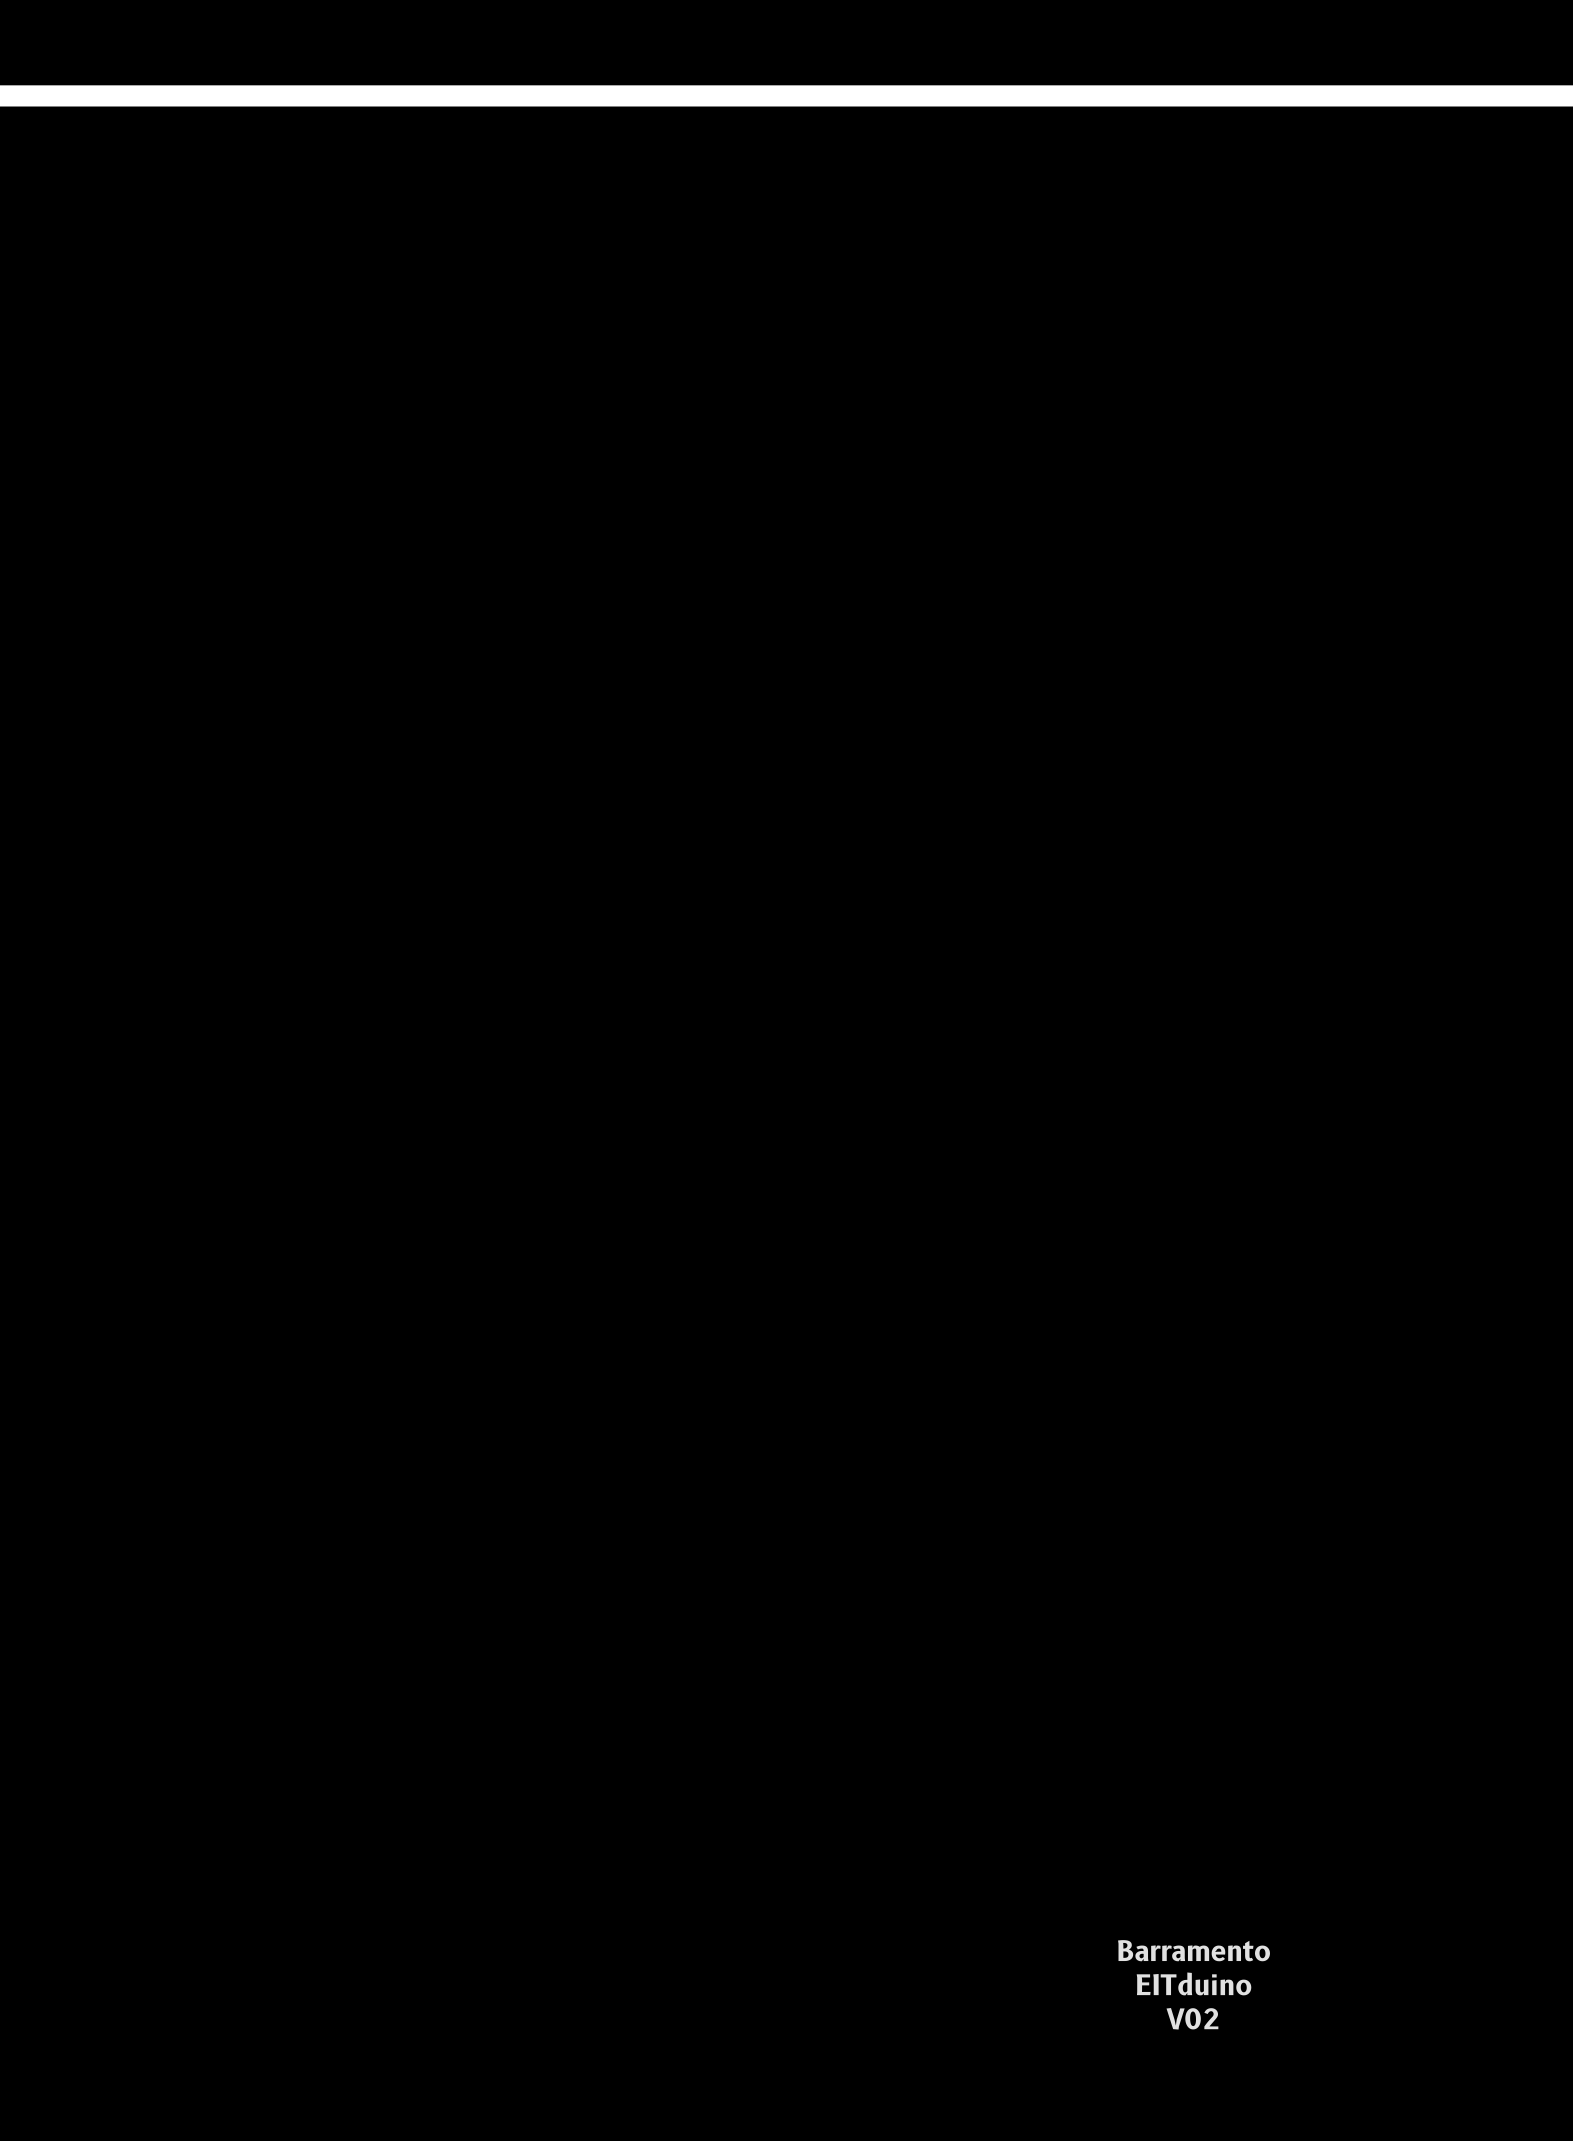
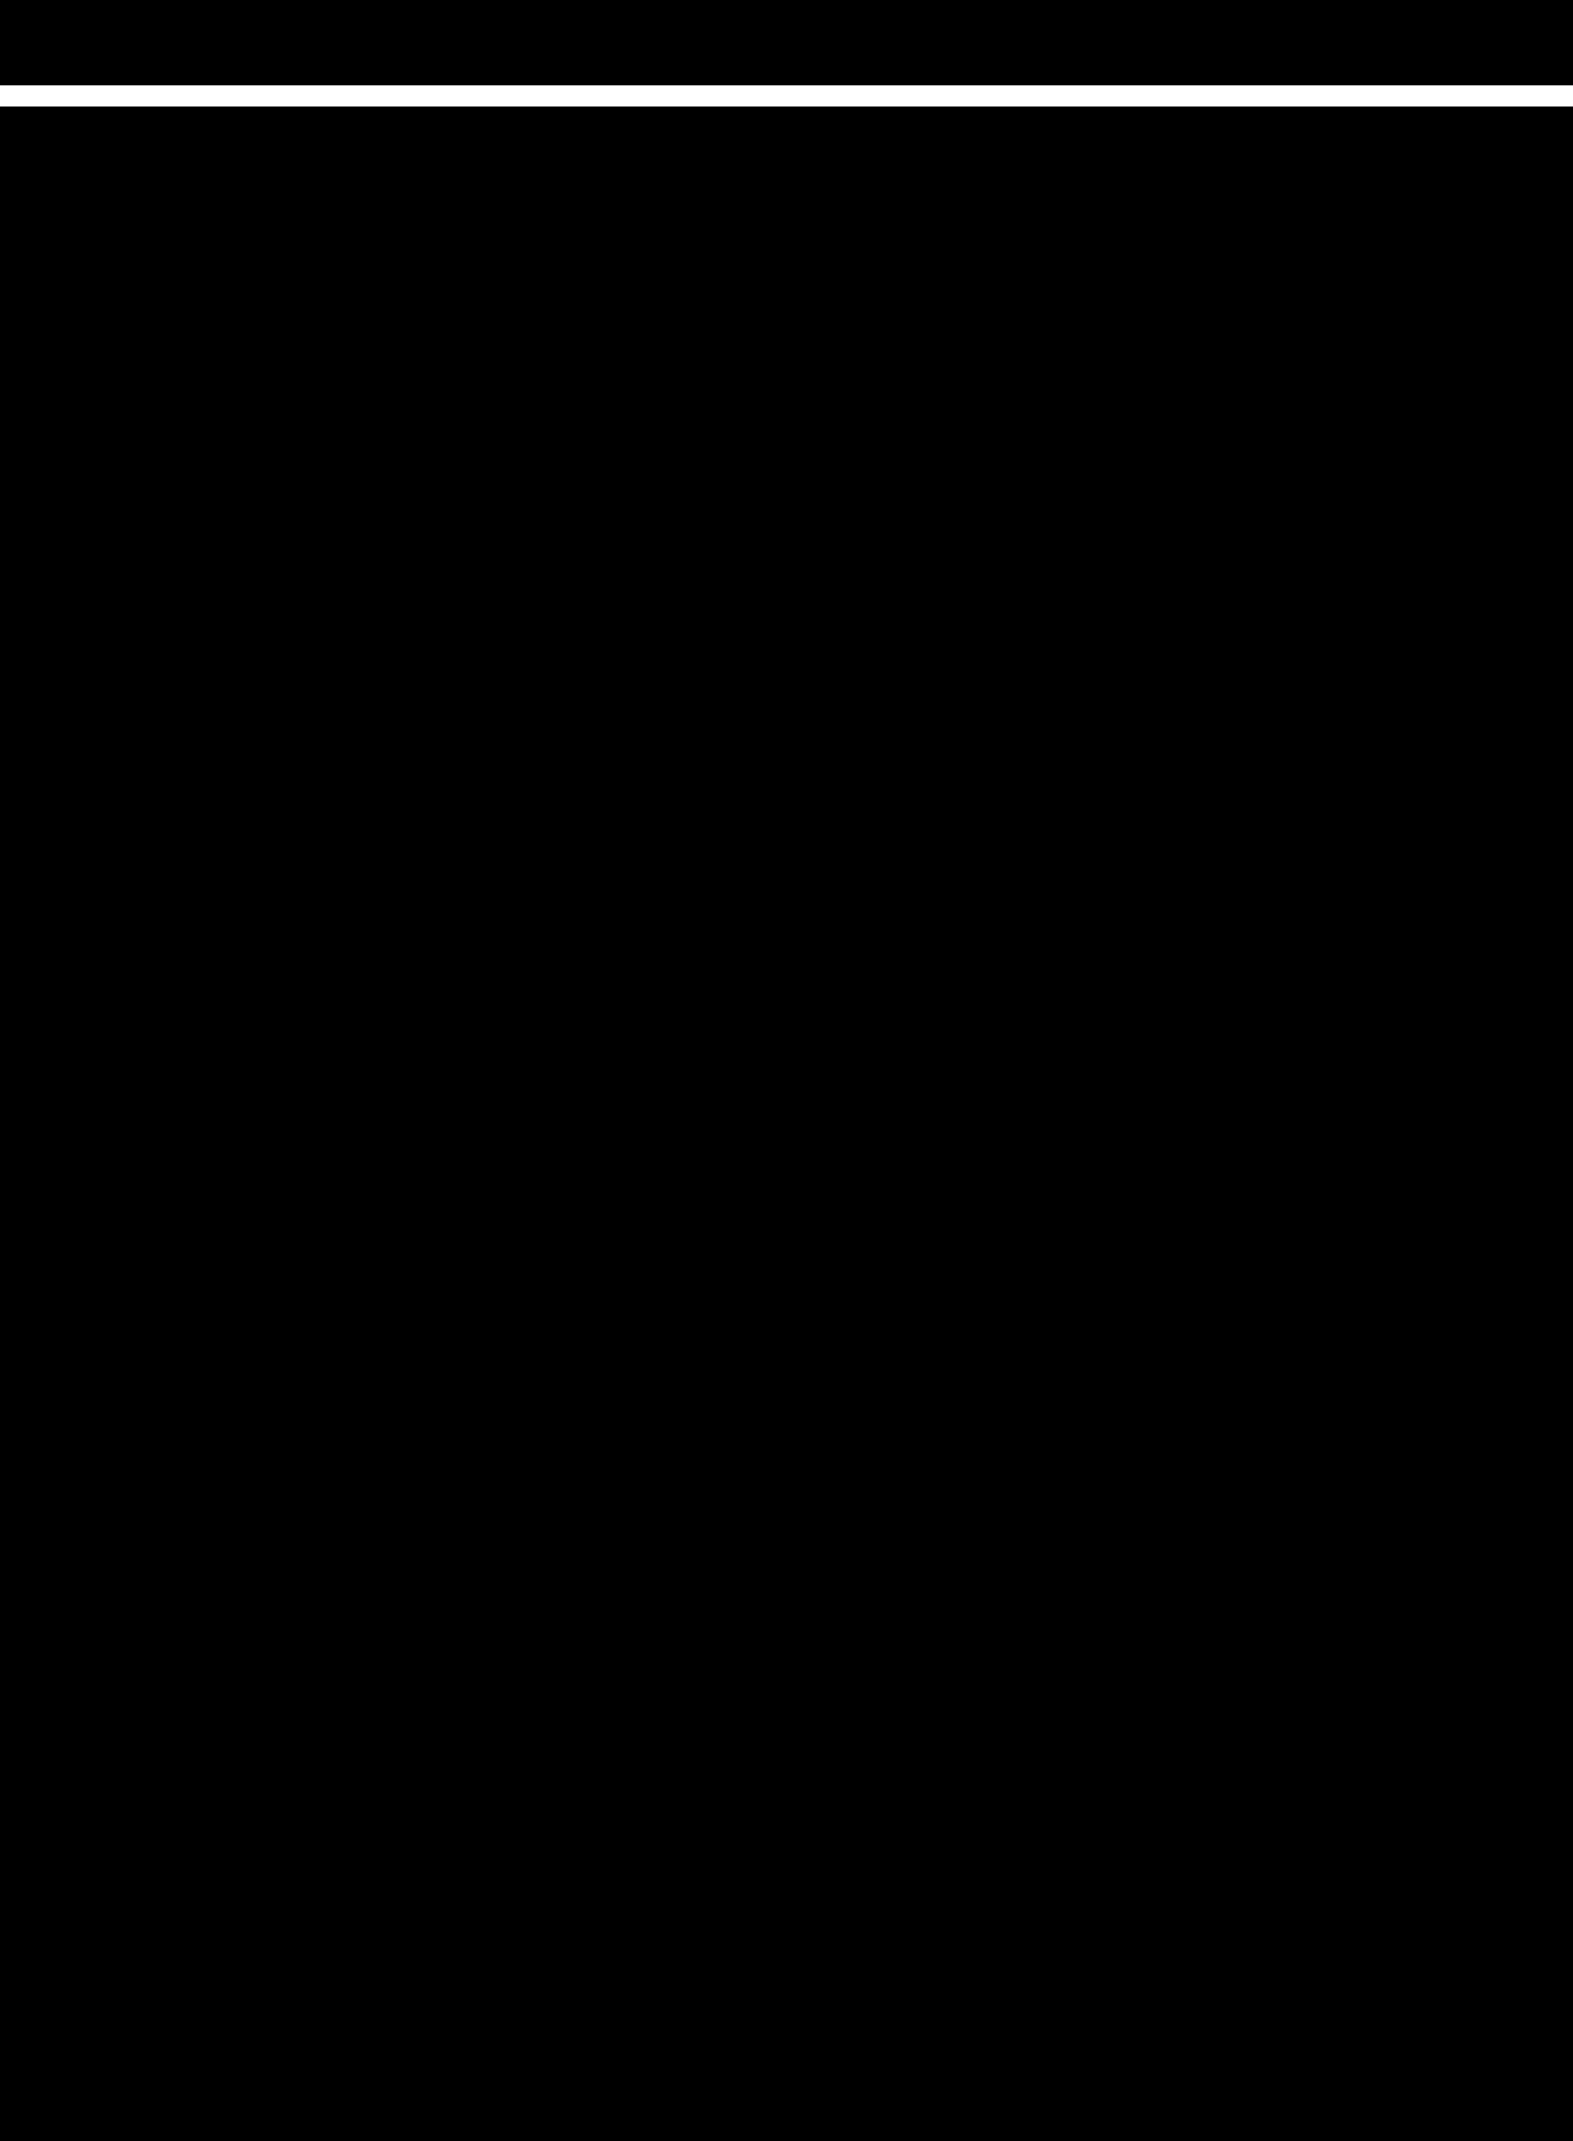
text: Barramento (1194, 1950) -> none
text: EITduino (1193, 1983) -> none
text: V02 (1192, 2018) -> none

